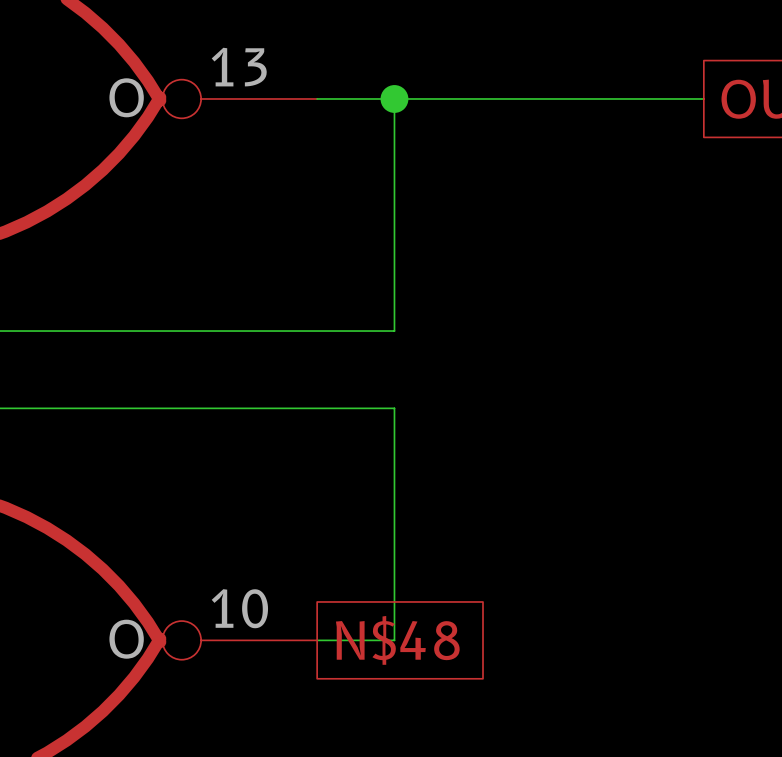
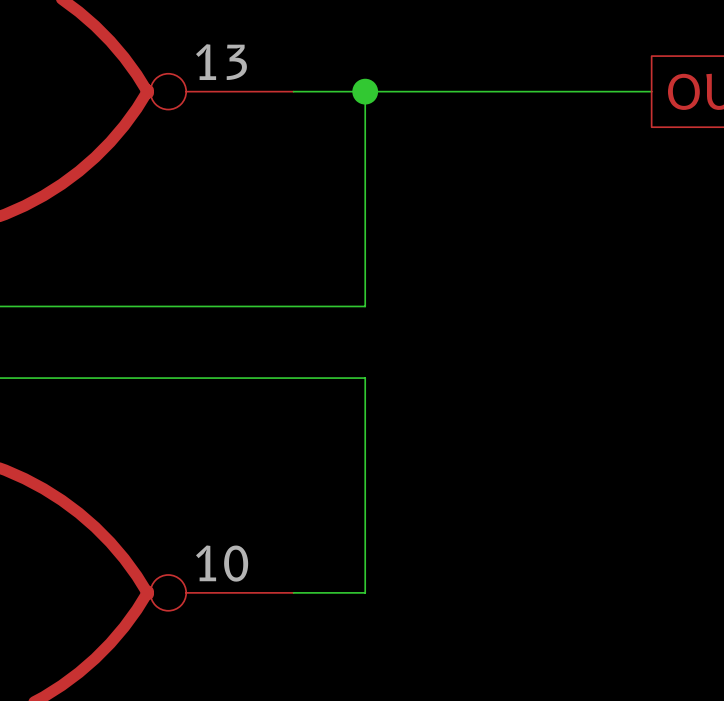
part pin name: O (126, 97) -> none
part pin name: O (126, 639) -> none
global label: N$48 (397, 640) -> none

